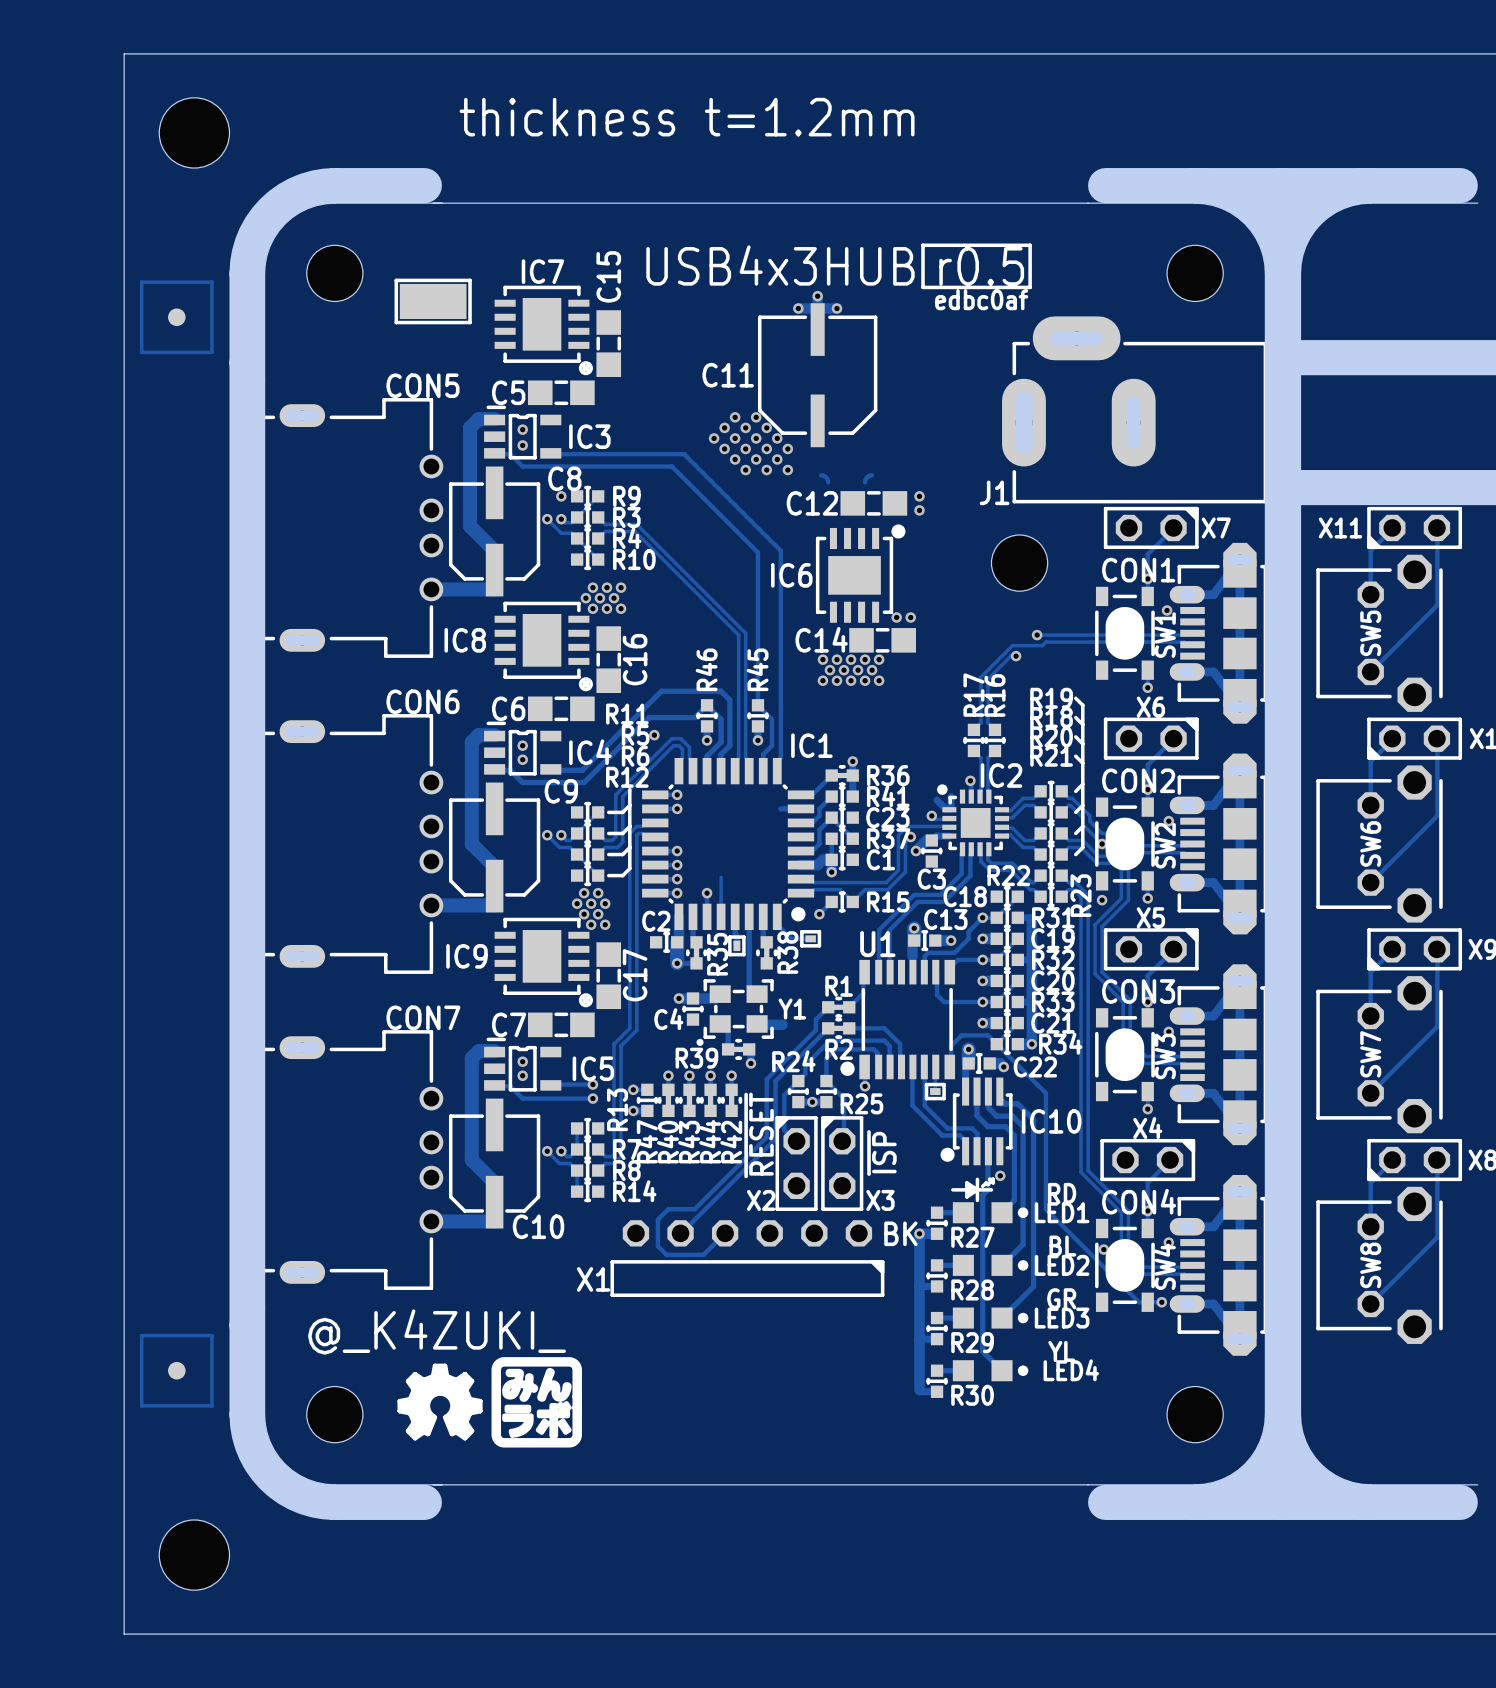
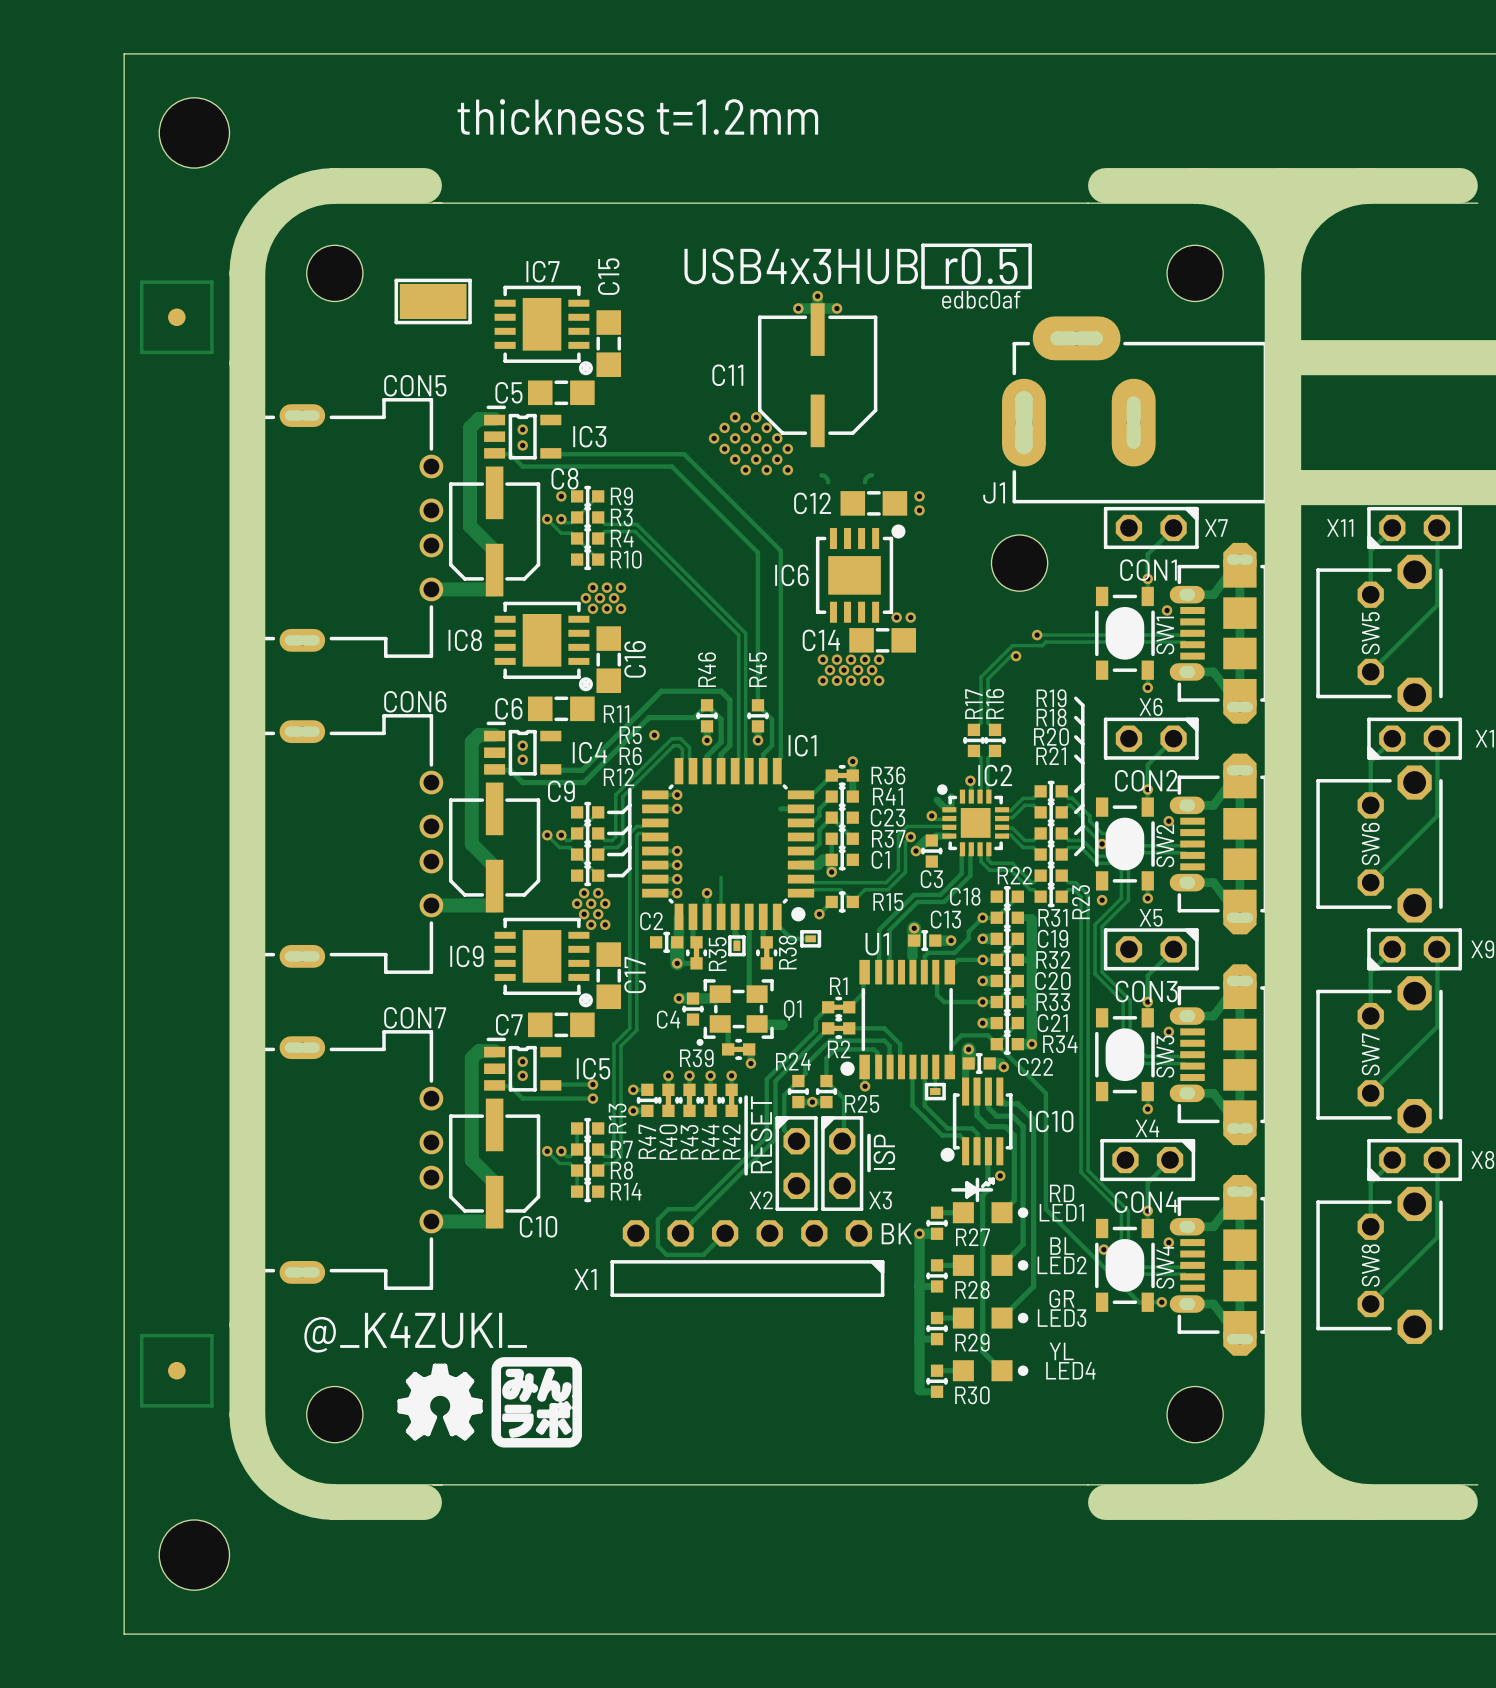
Y1 name: Y1 (792, 1009) -> Q1 (792, 1010)

